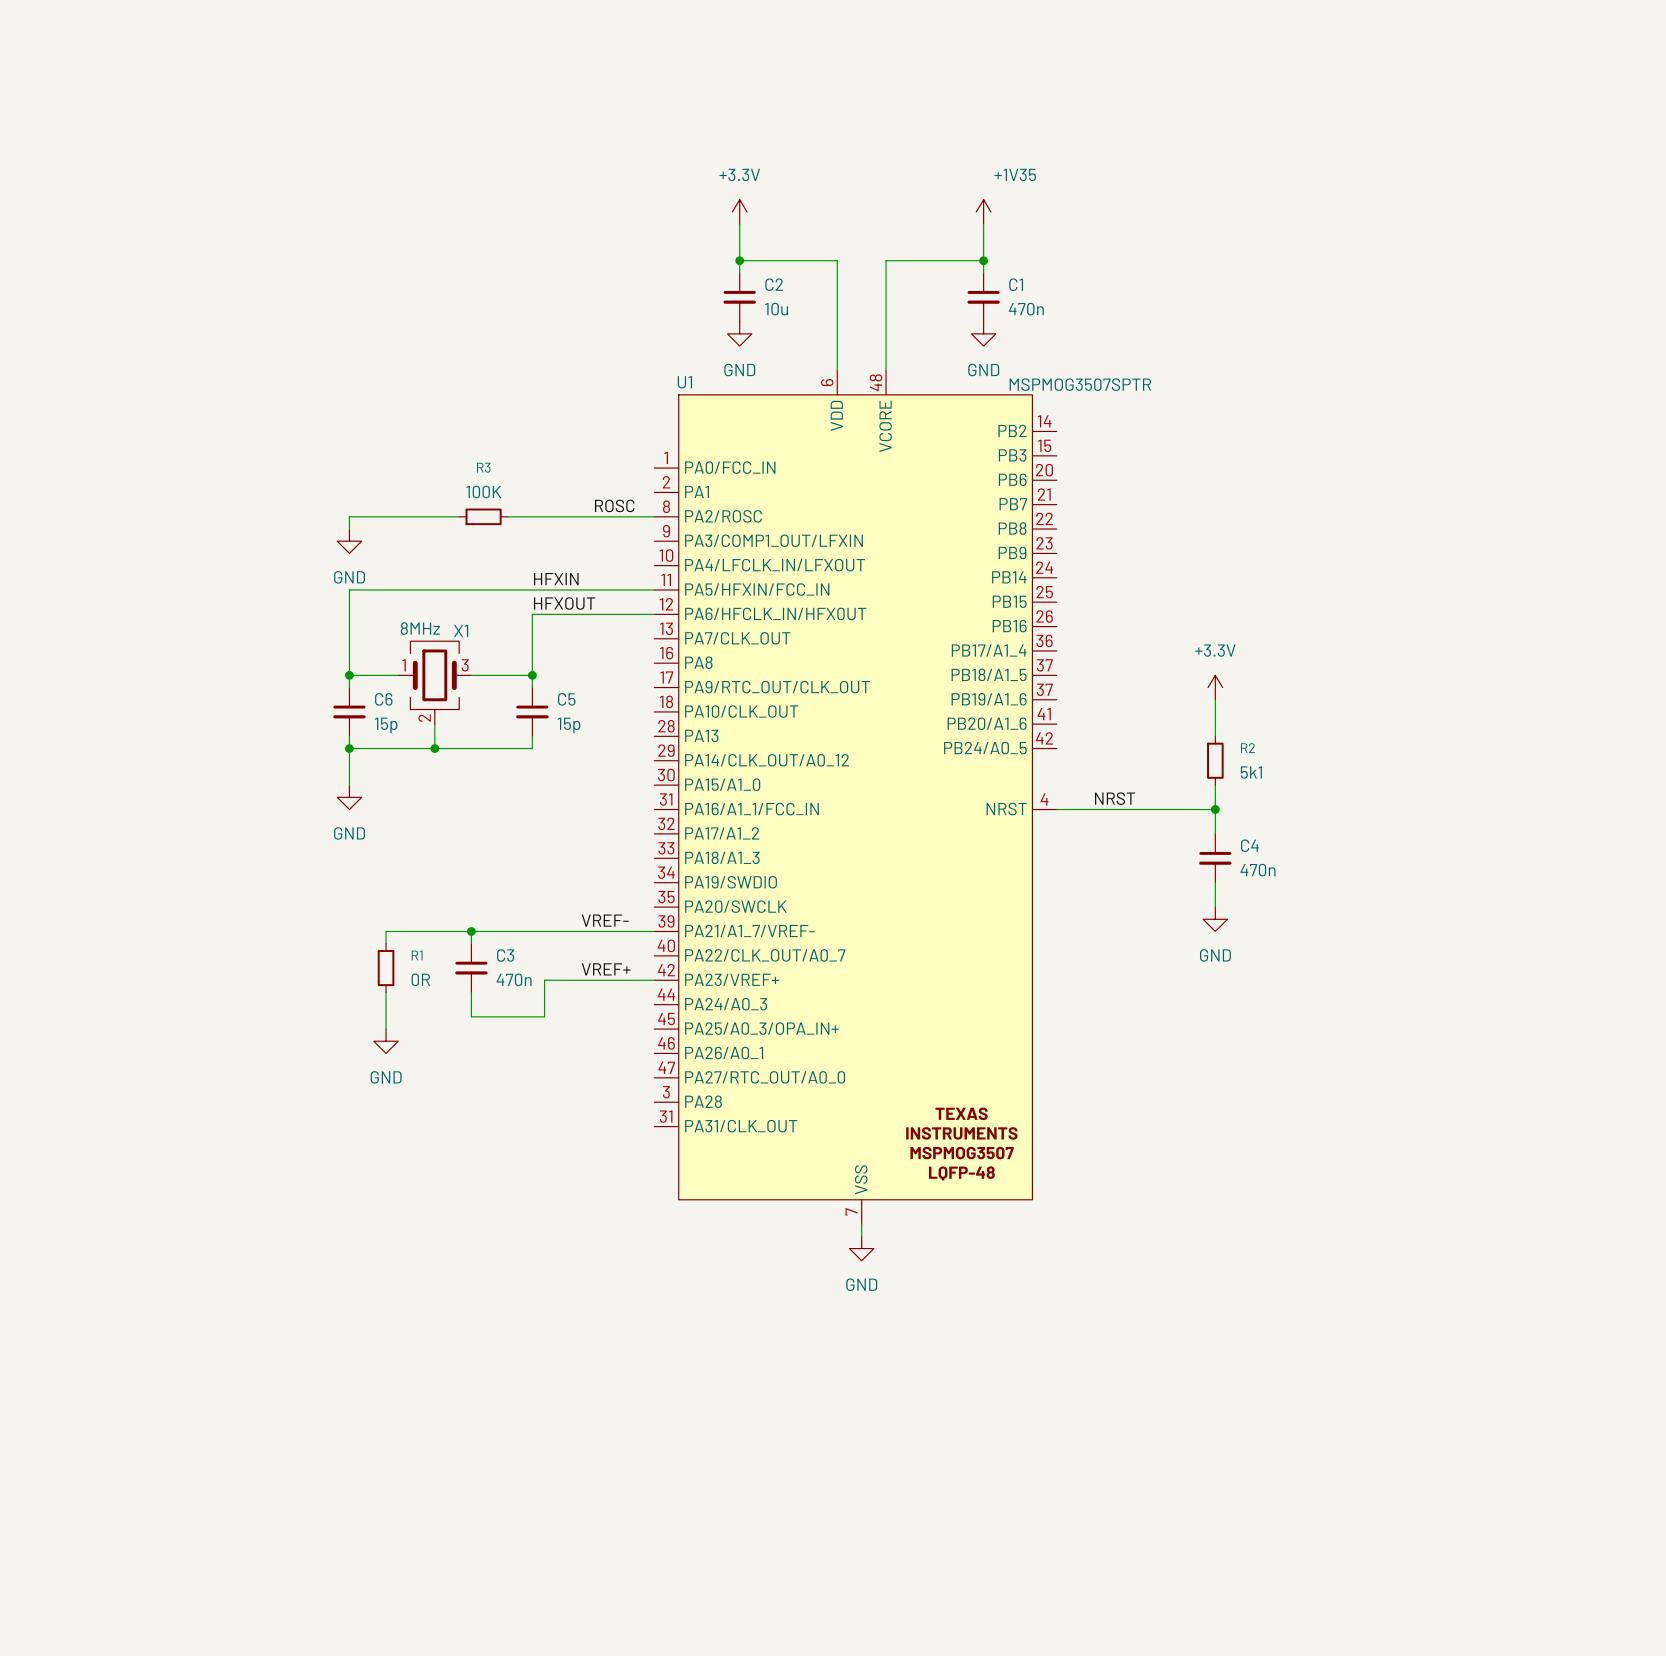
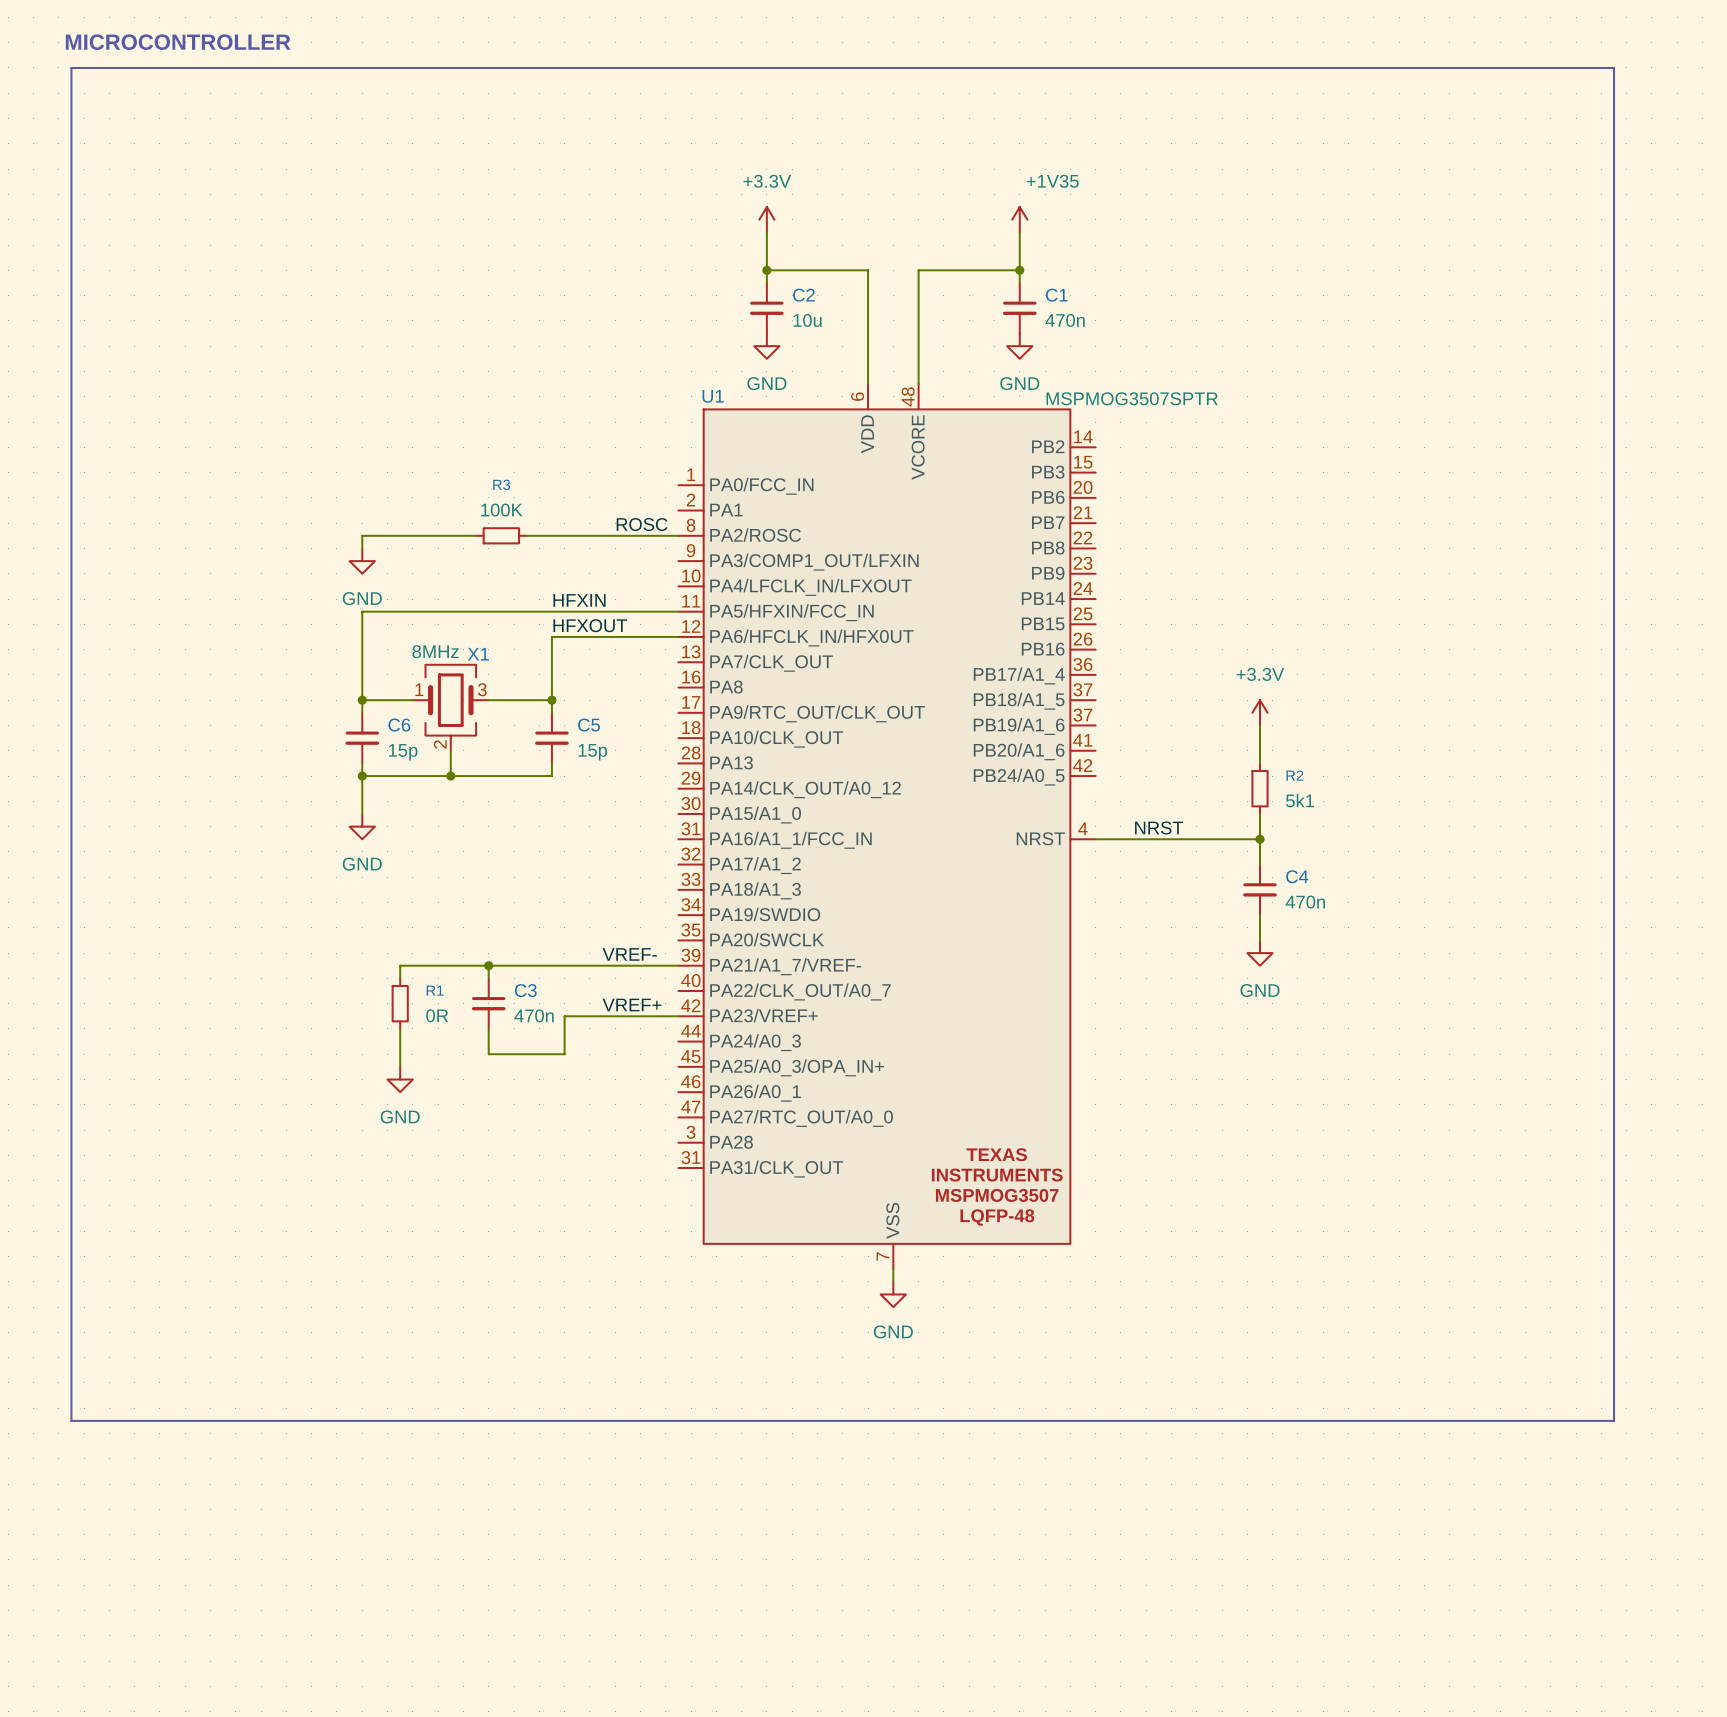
text: none -> MICROCONTROLLER (178, 42)
line: none -> (71, 67) (1614, 67) (1614, 1420) (71, 1420) (71, 67)

